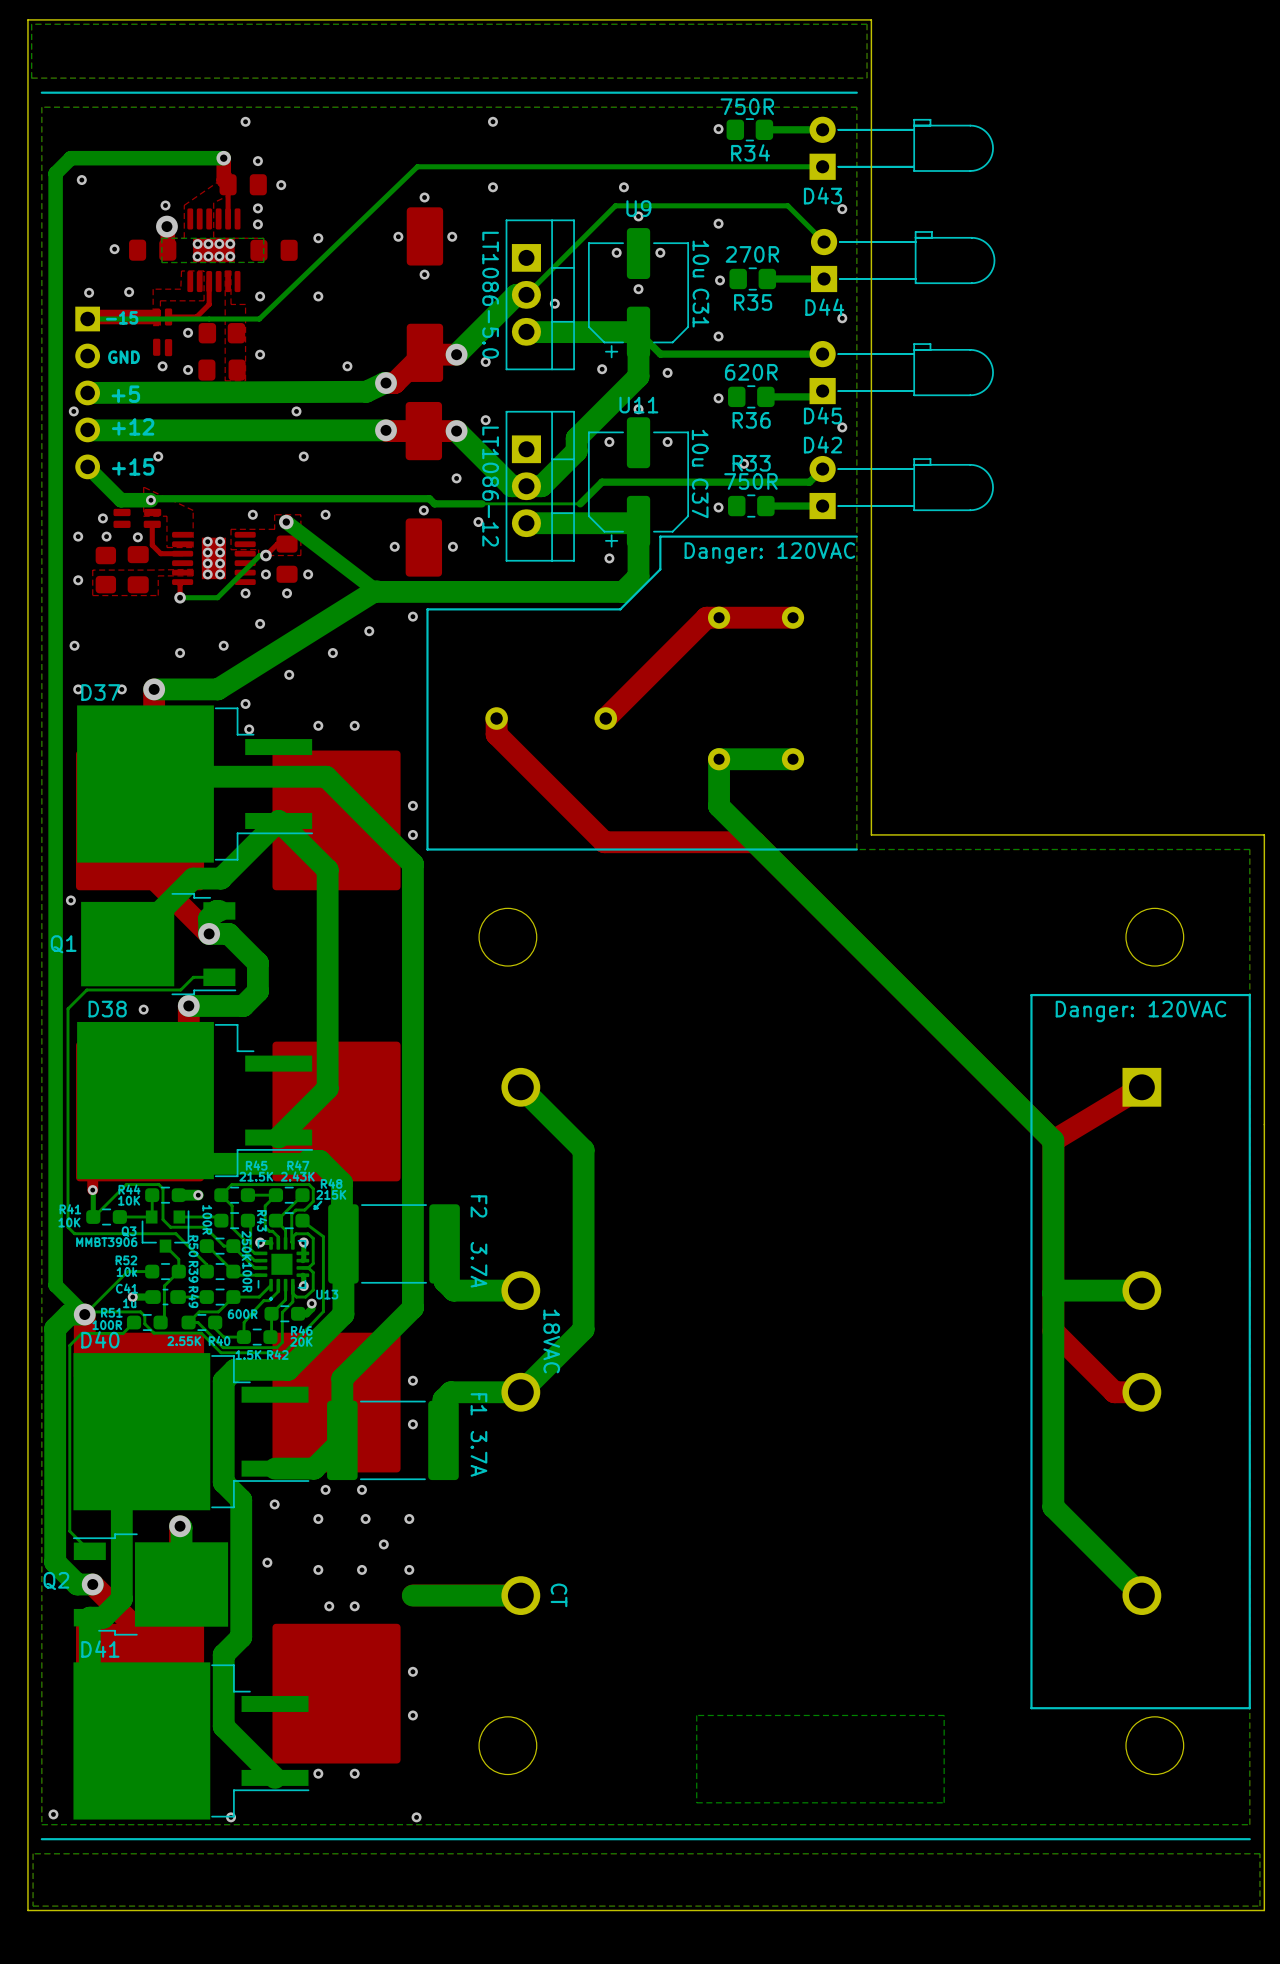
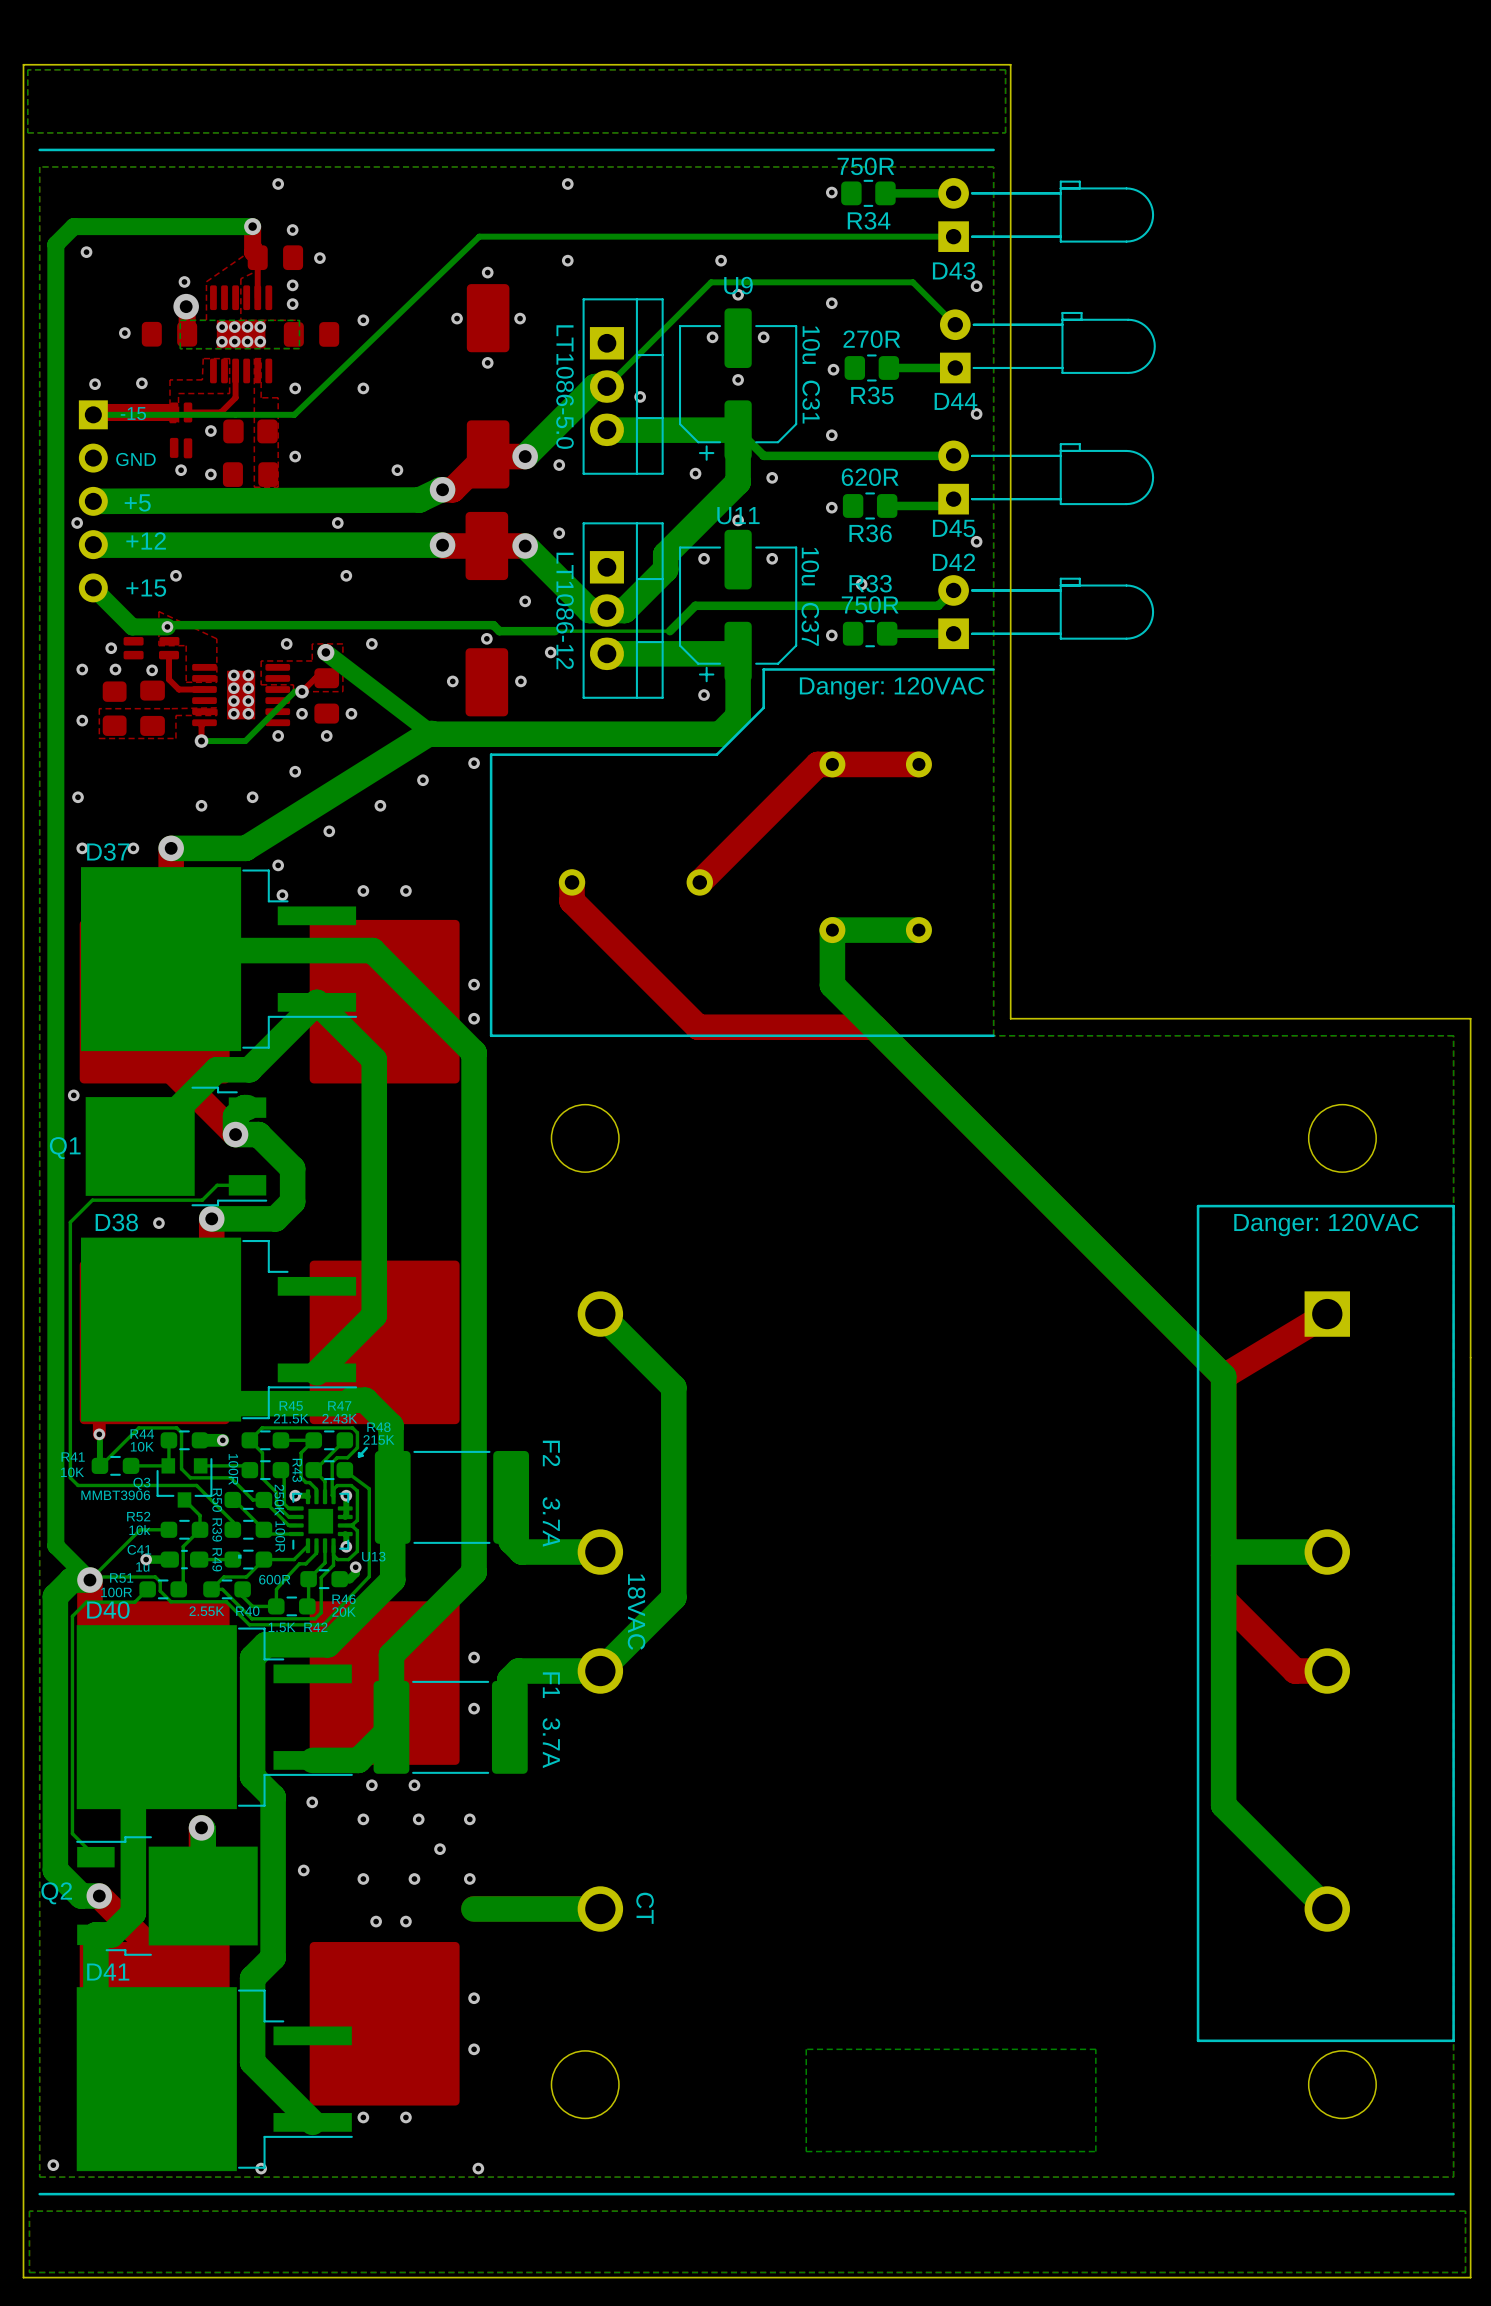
text position: . (271, 1298) -> . (239, 1556)

